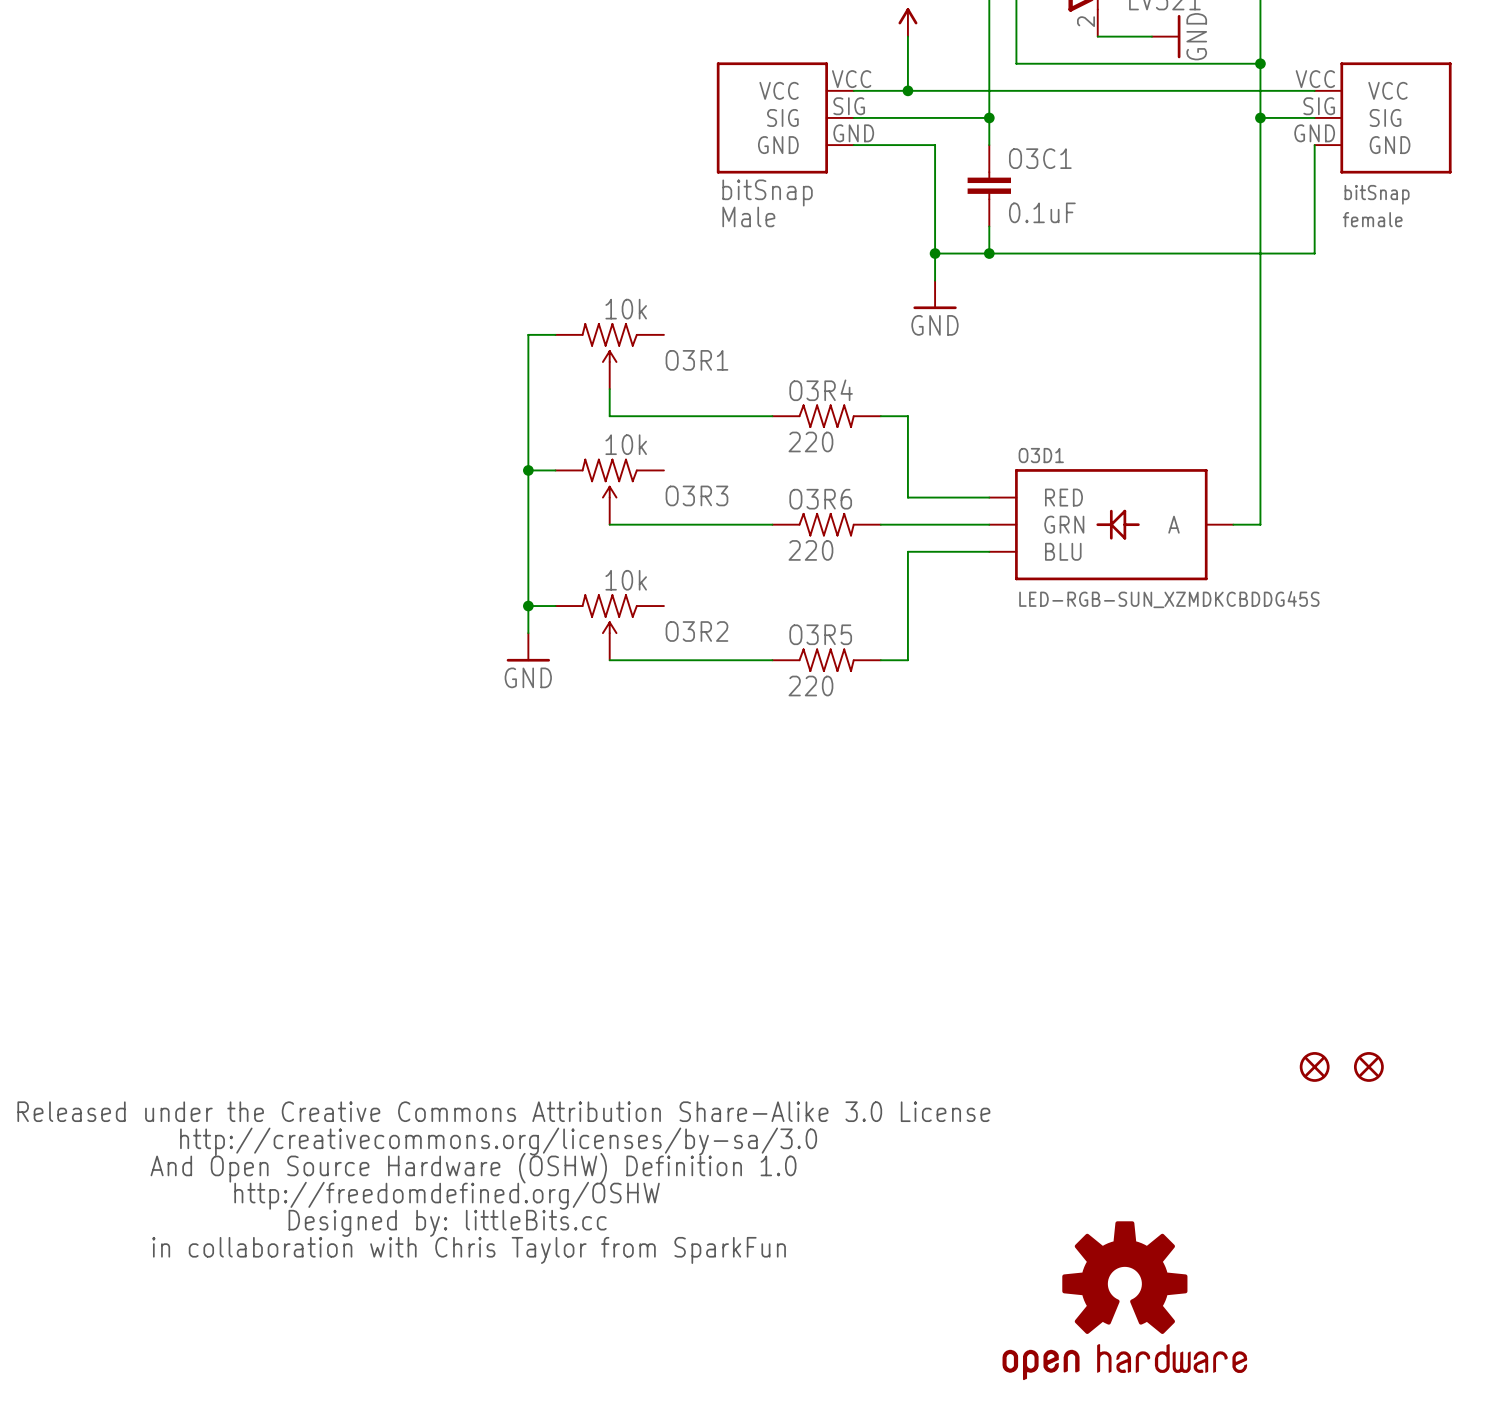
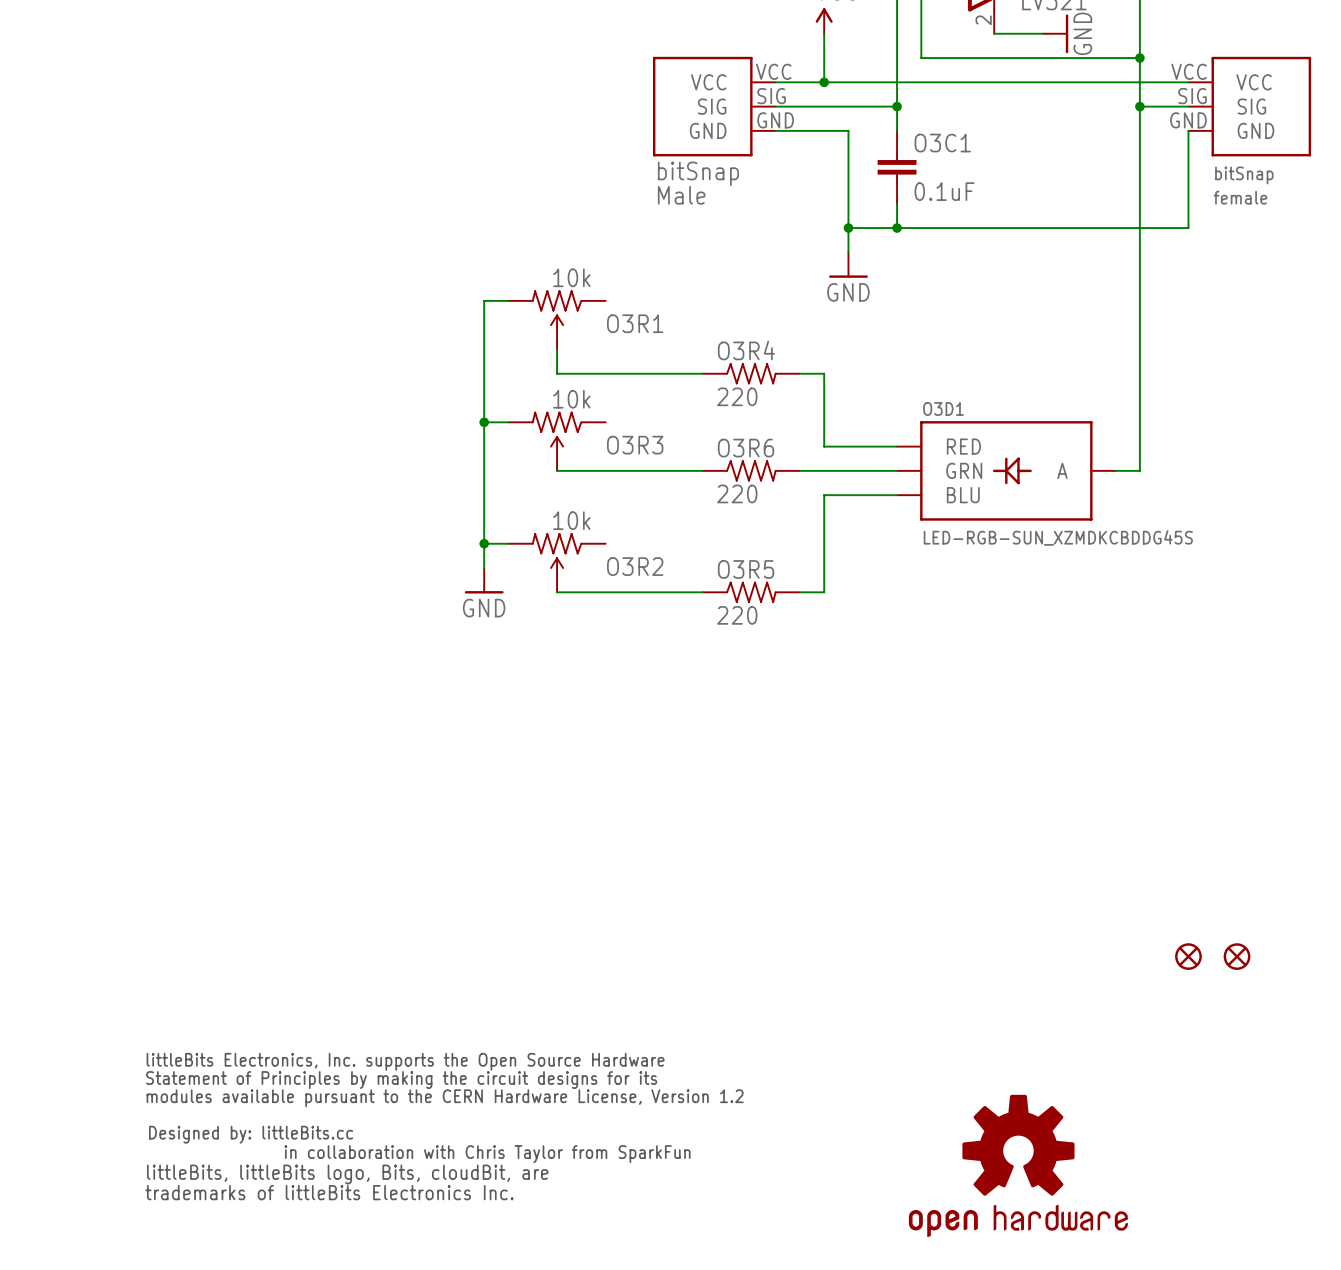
part: (503, 1182) -> none
part: none -> (444, 1126)
text: none -> in collaboration with Chris Taylor from SparkFun (487, 1154)

